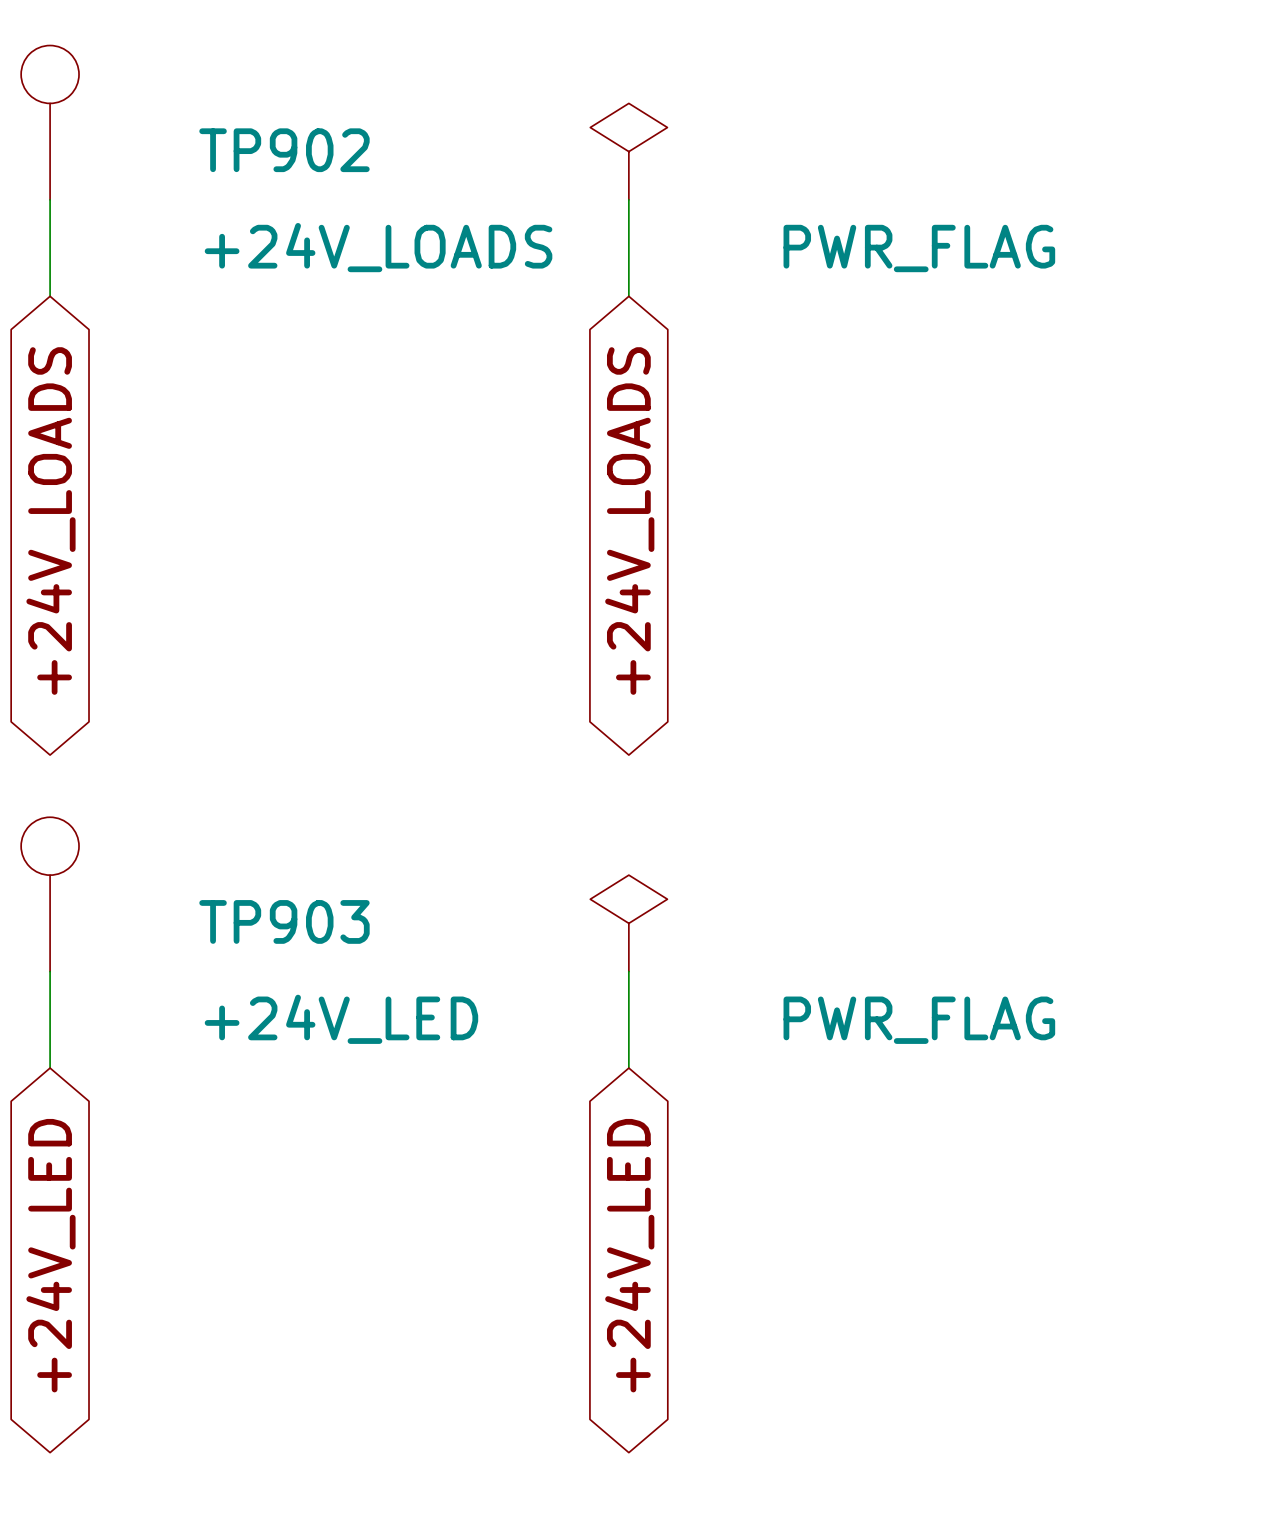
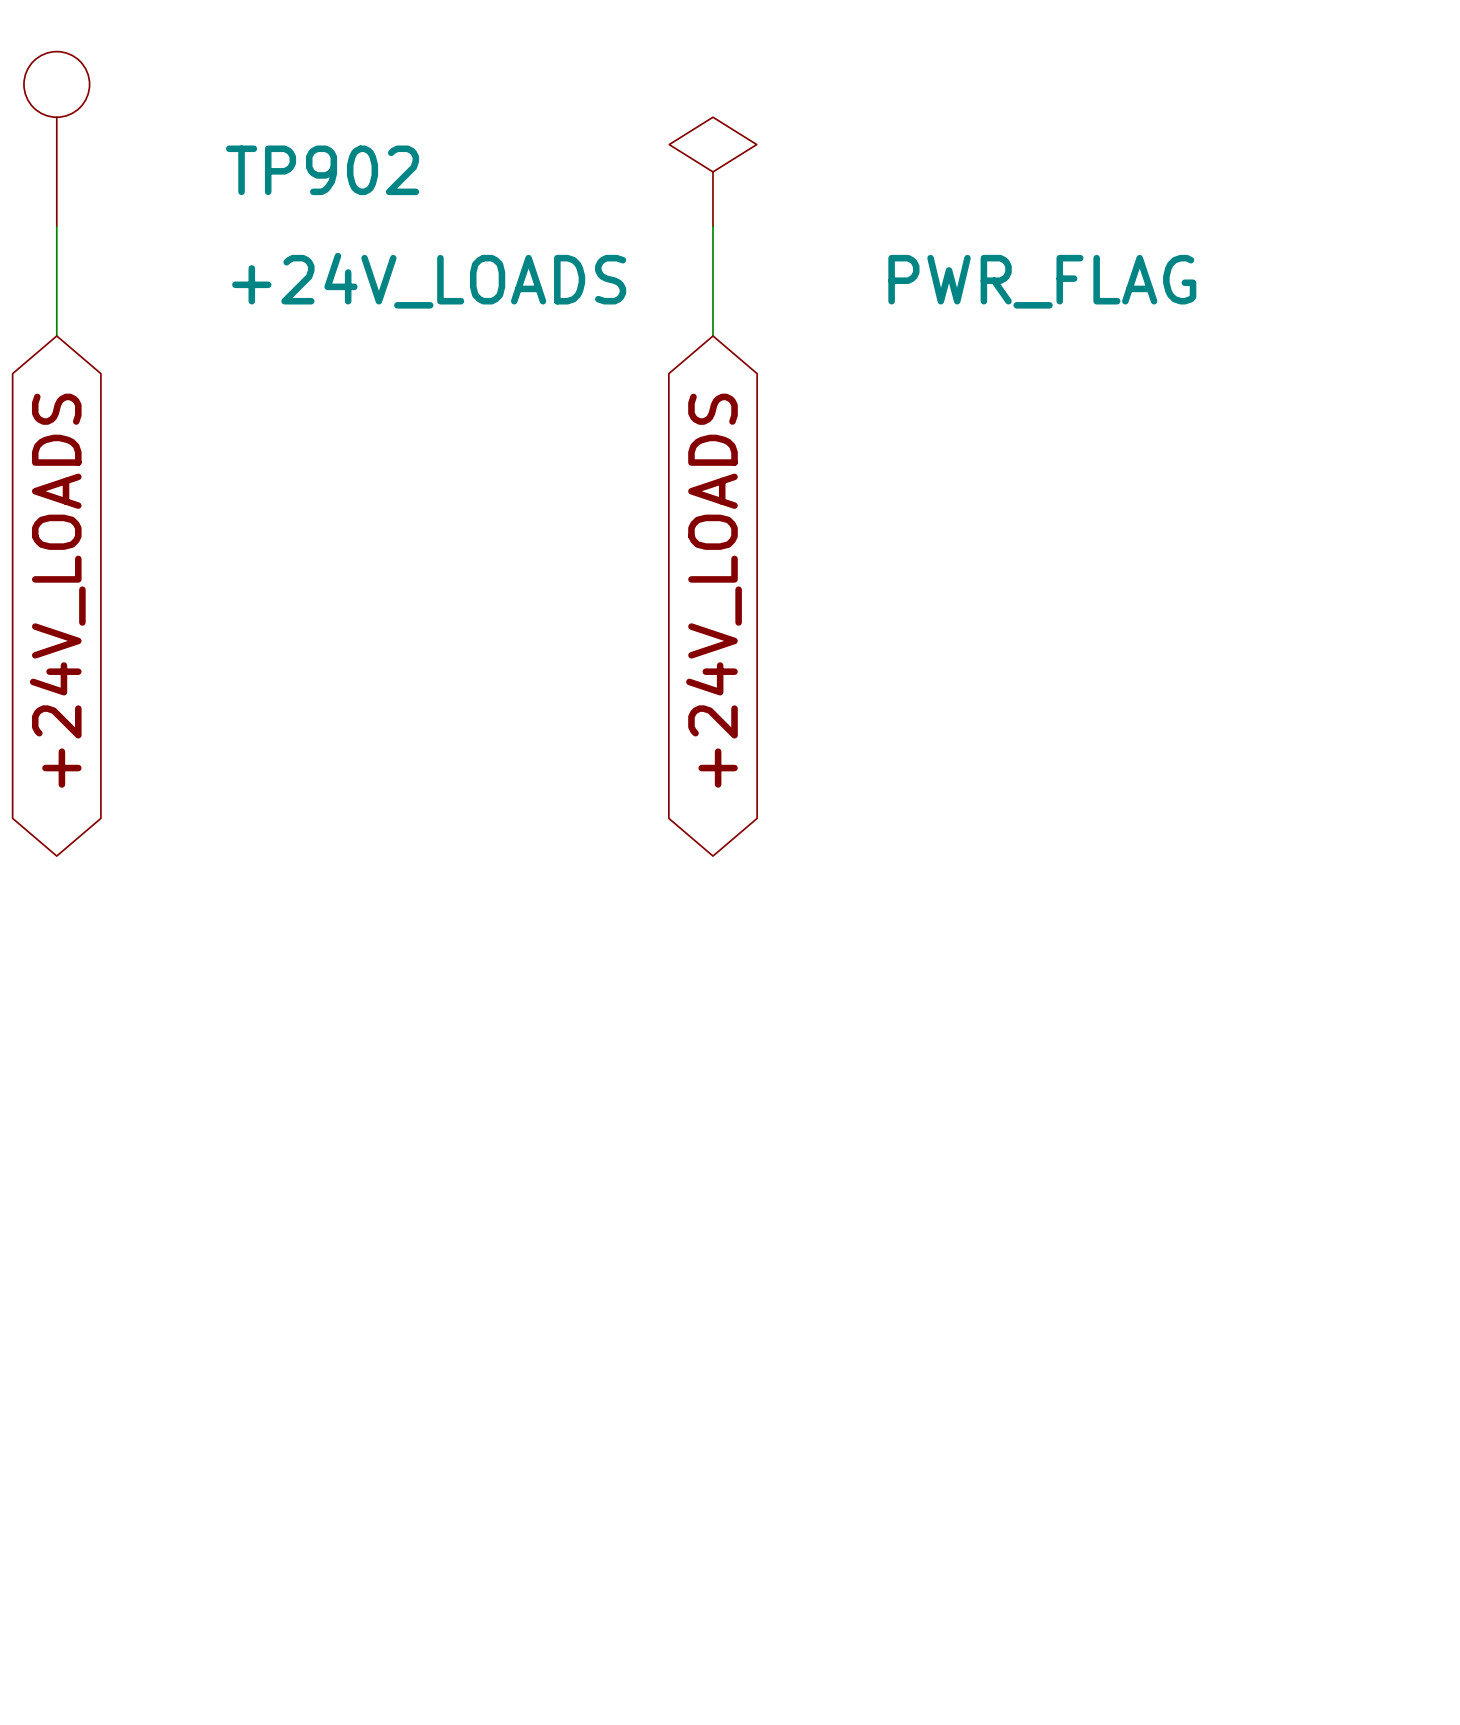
TP903: +24V_LED (50, 894) -> none
power symbol: PWR_FLAG (628, 923) -> none
wire: (50, 971) (50, 1068) -> none
wire: (628, 971) (628, 1068) -> none
global label: +24V_LED (50, 1255) -> none
global label: +24V_LED (629, 1255) -> none

